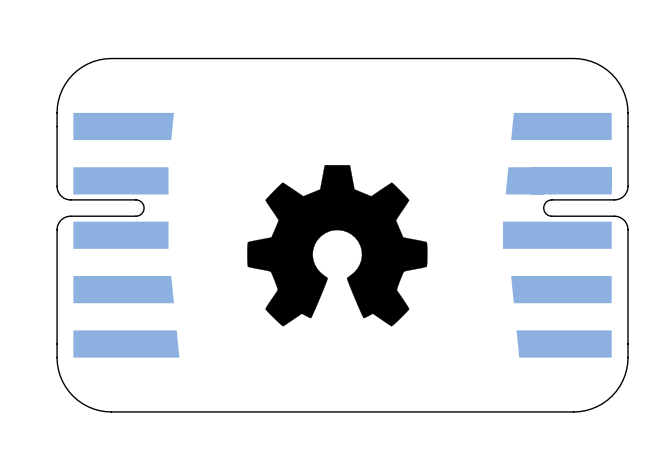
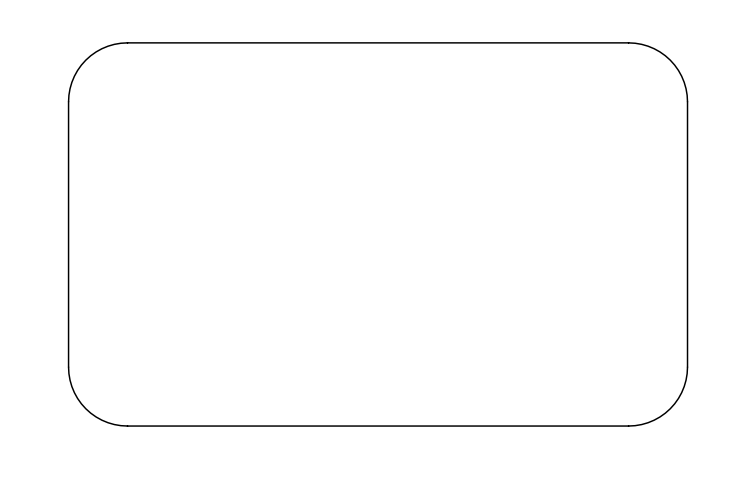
board edge: none -> (68, 116) (68, 352)
board edge: none -> (687, 116) (687, 352)
drawing: [247, 165, 428, 327] -> none
part: (117, 235) -> none
part: (565, 235) -> none

